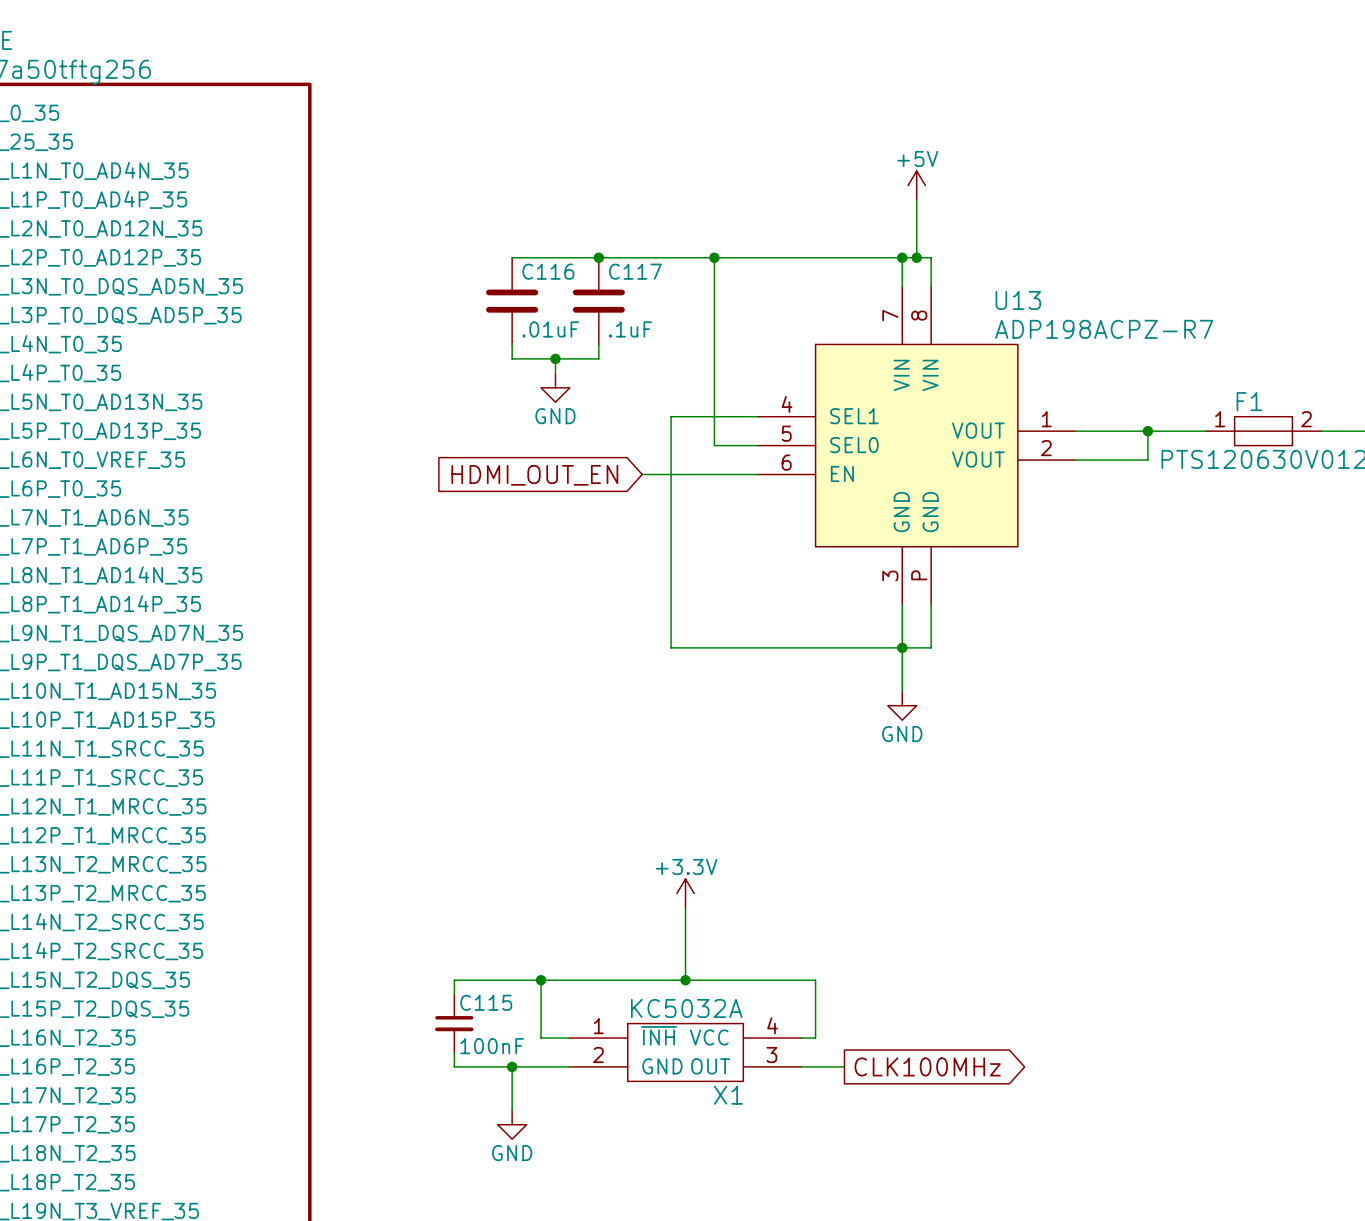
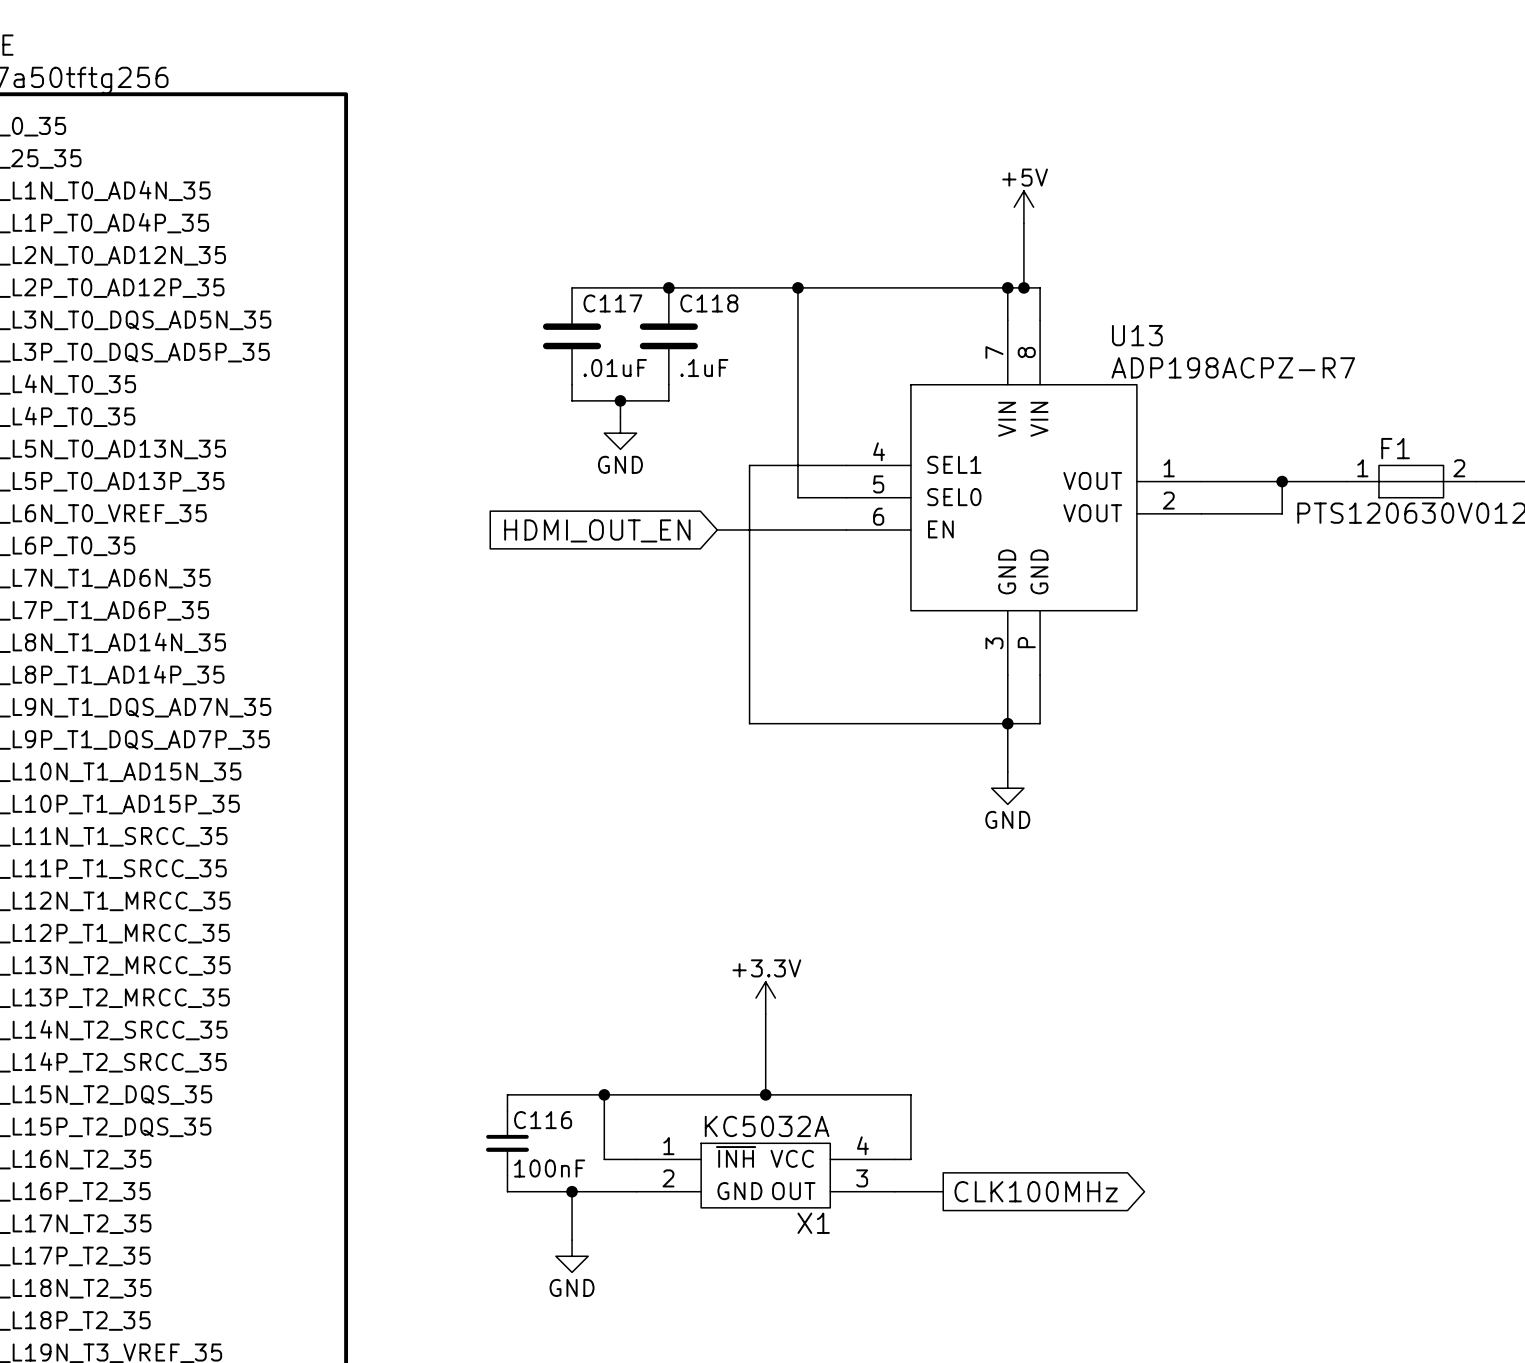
C116 name: C116 (548, 271) -> C117 (612, 303)
C117 name: C117 (635, 271) -> C118 (709, 303)
C115 name: C115 (486, 1002) -> C116 (543, 1120)

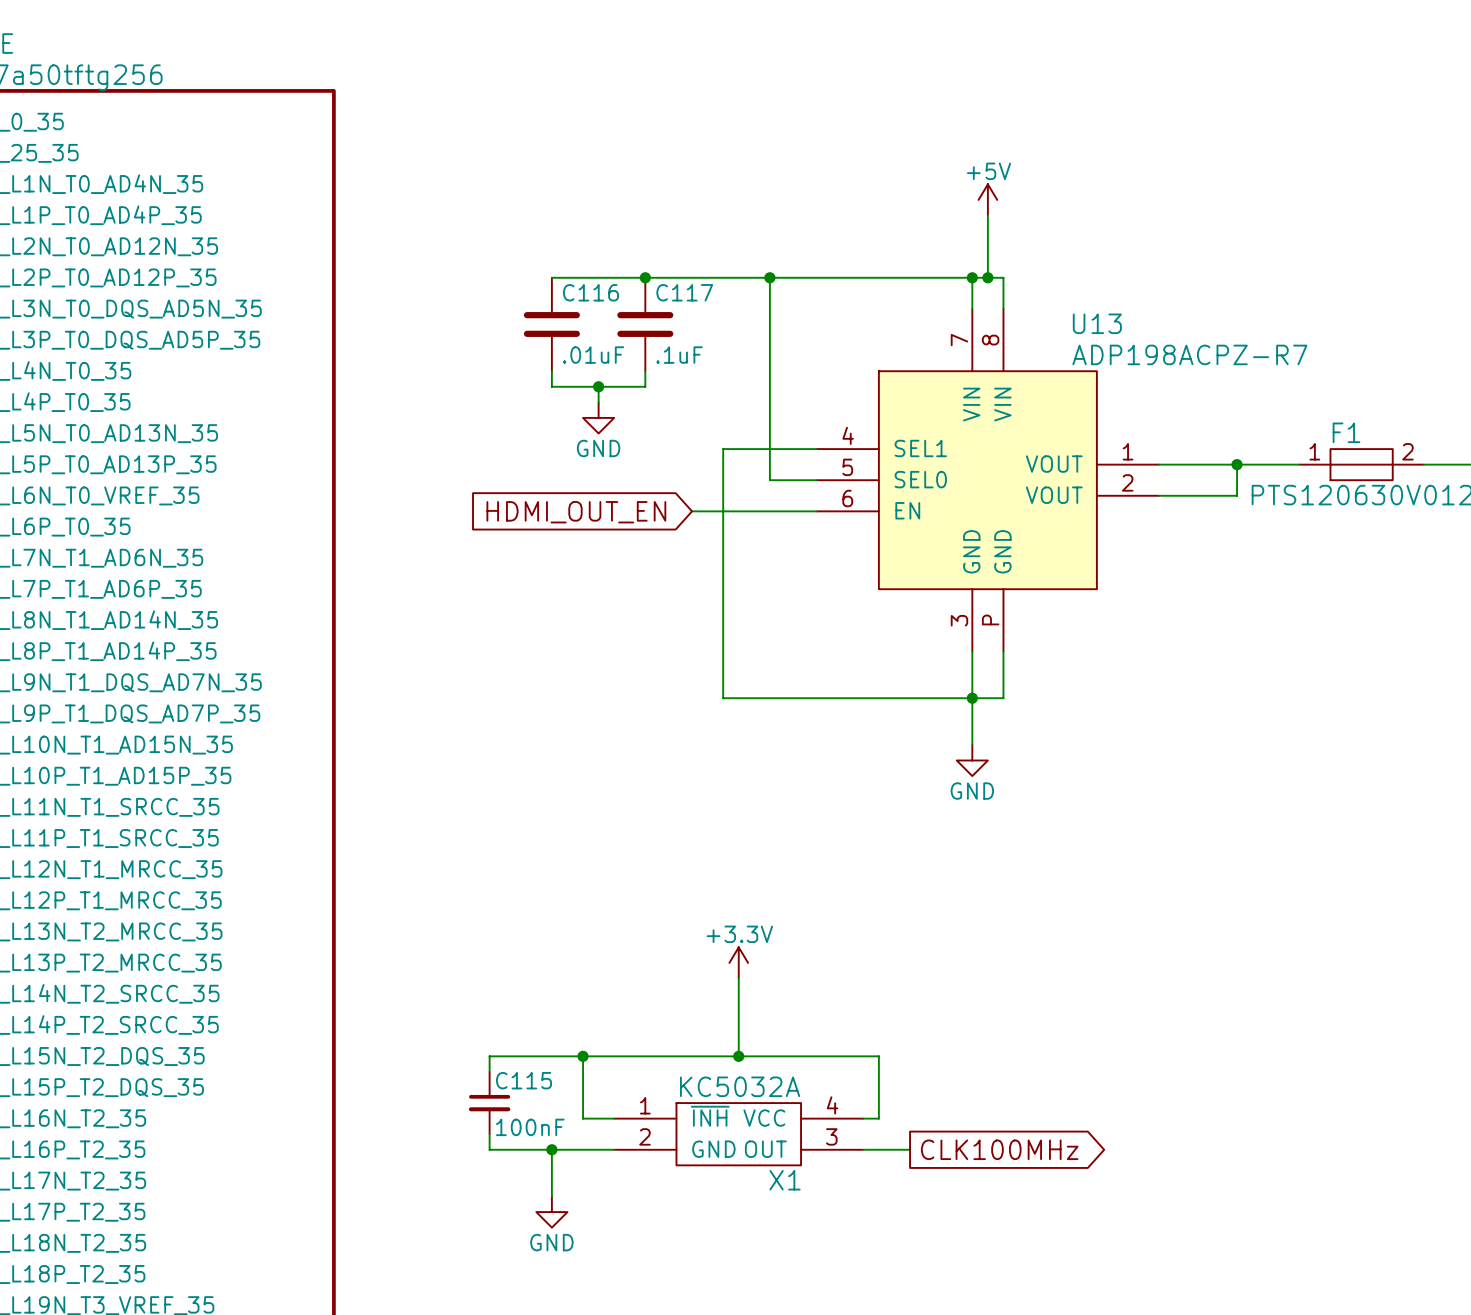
C117 name: C117 (612, 303) -> C116 (590, 292)
C118 name: C118 (709, 303) -> C117 (684, 292)
C116 name: C116 (543, 1120) -> C115 (523, 1080)

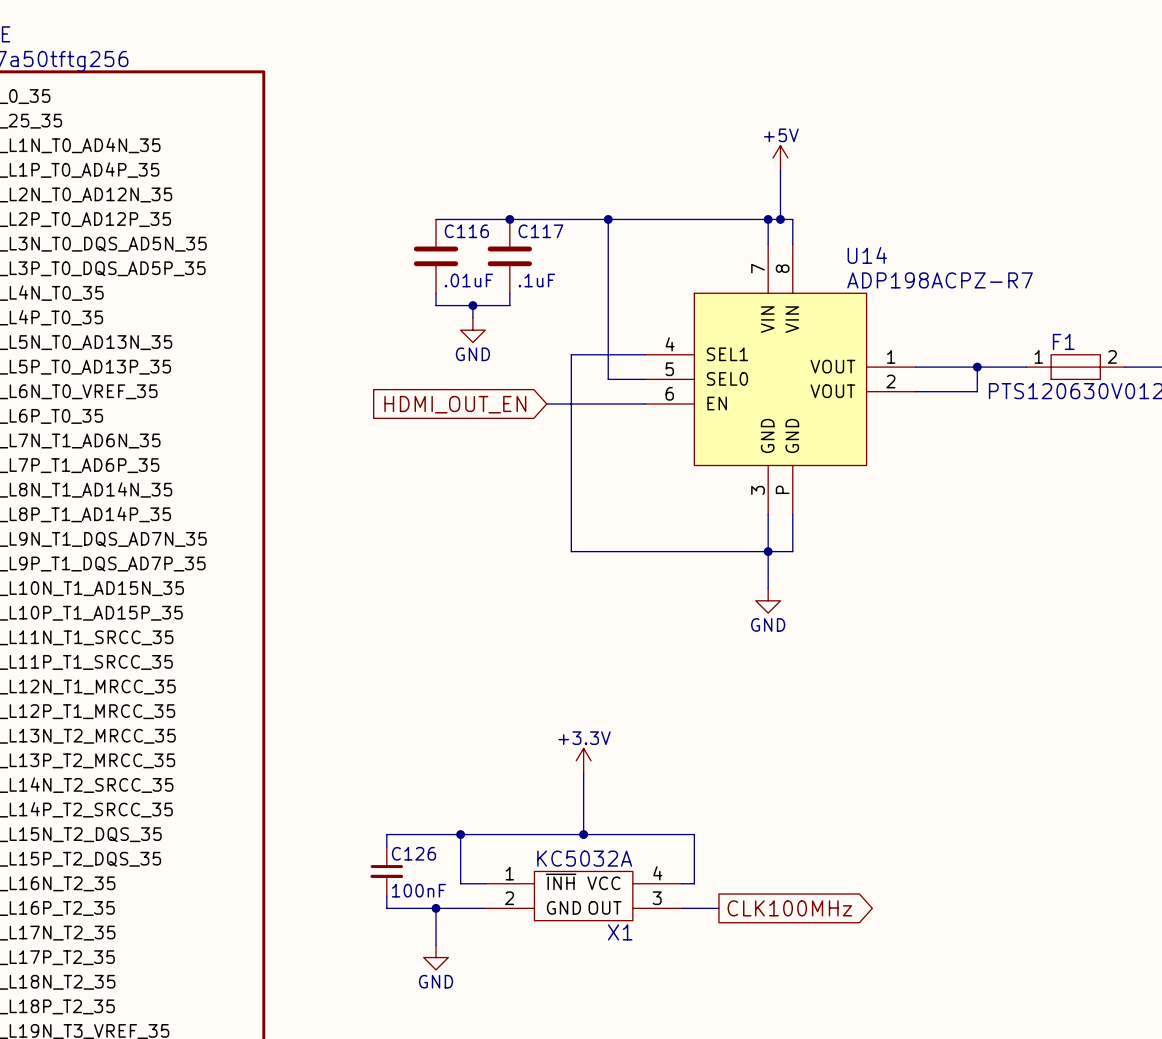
U13 name: U13 (1097, 323) -> U14 (867, 255)
C115 name: C115 (523, 1080) -> C126 (413, 853)

